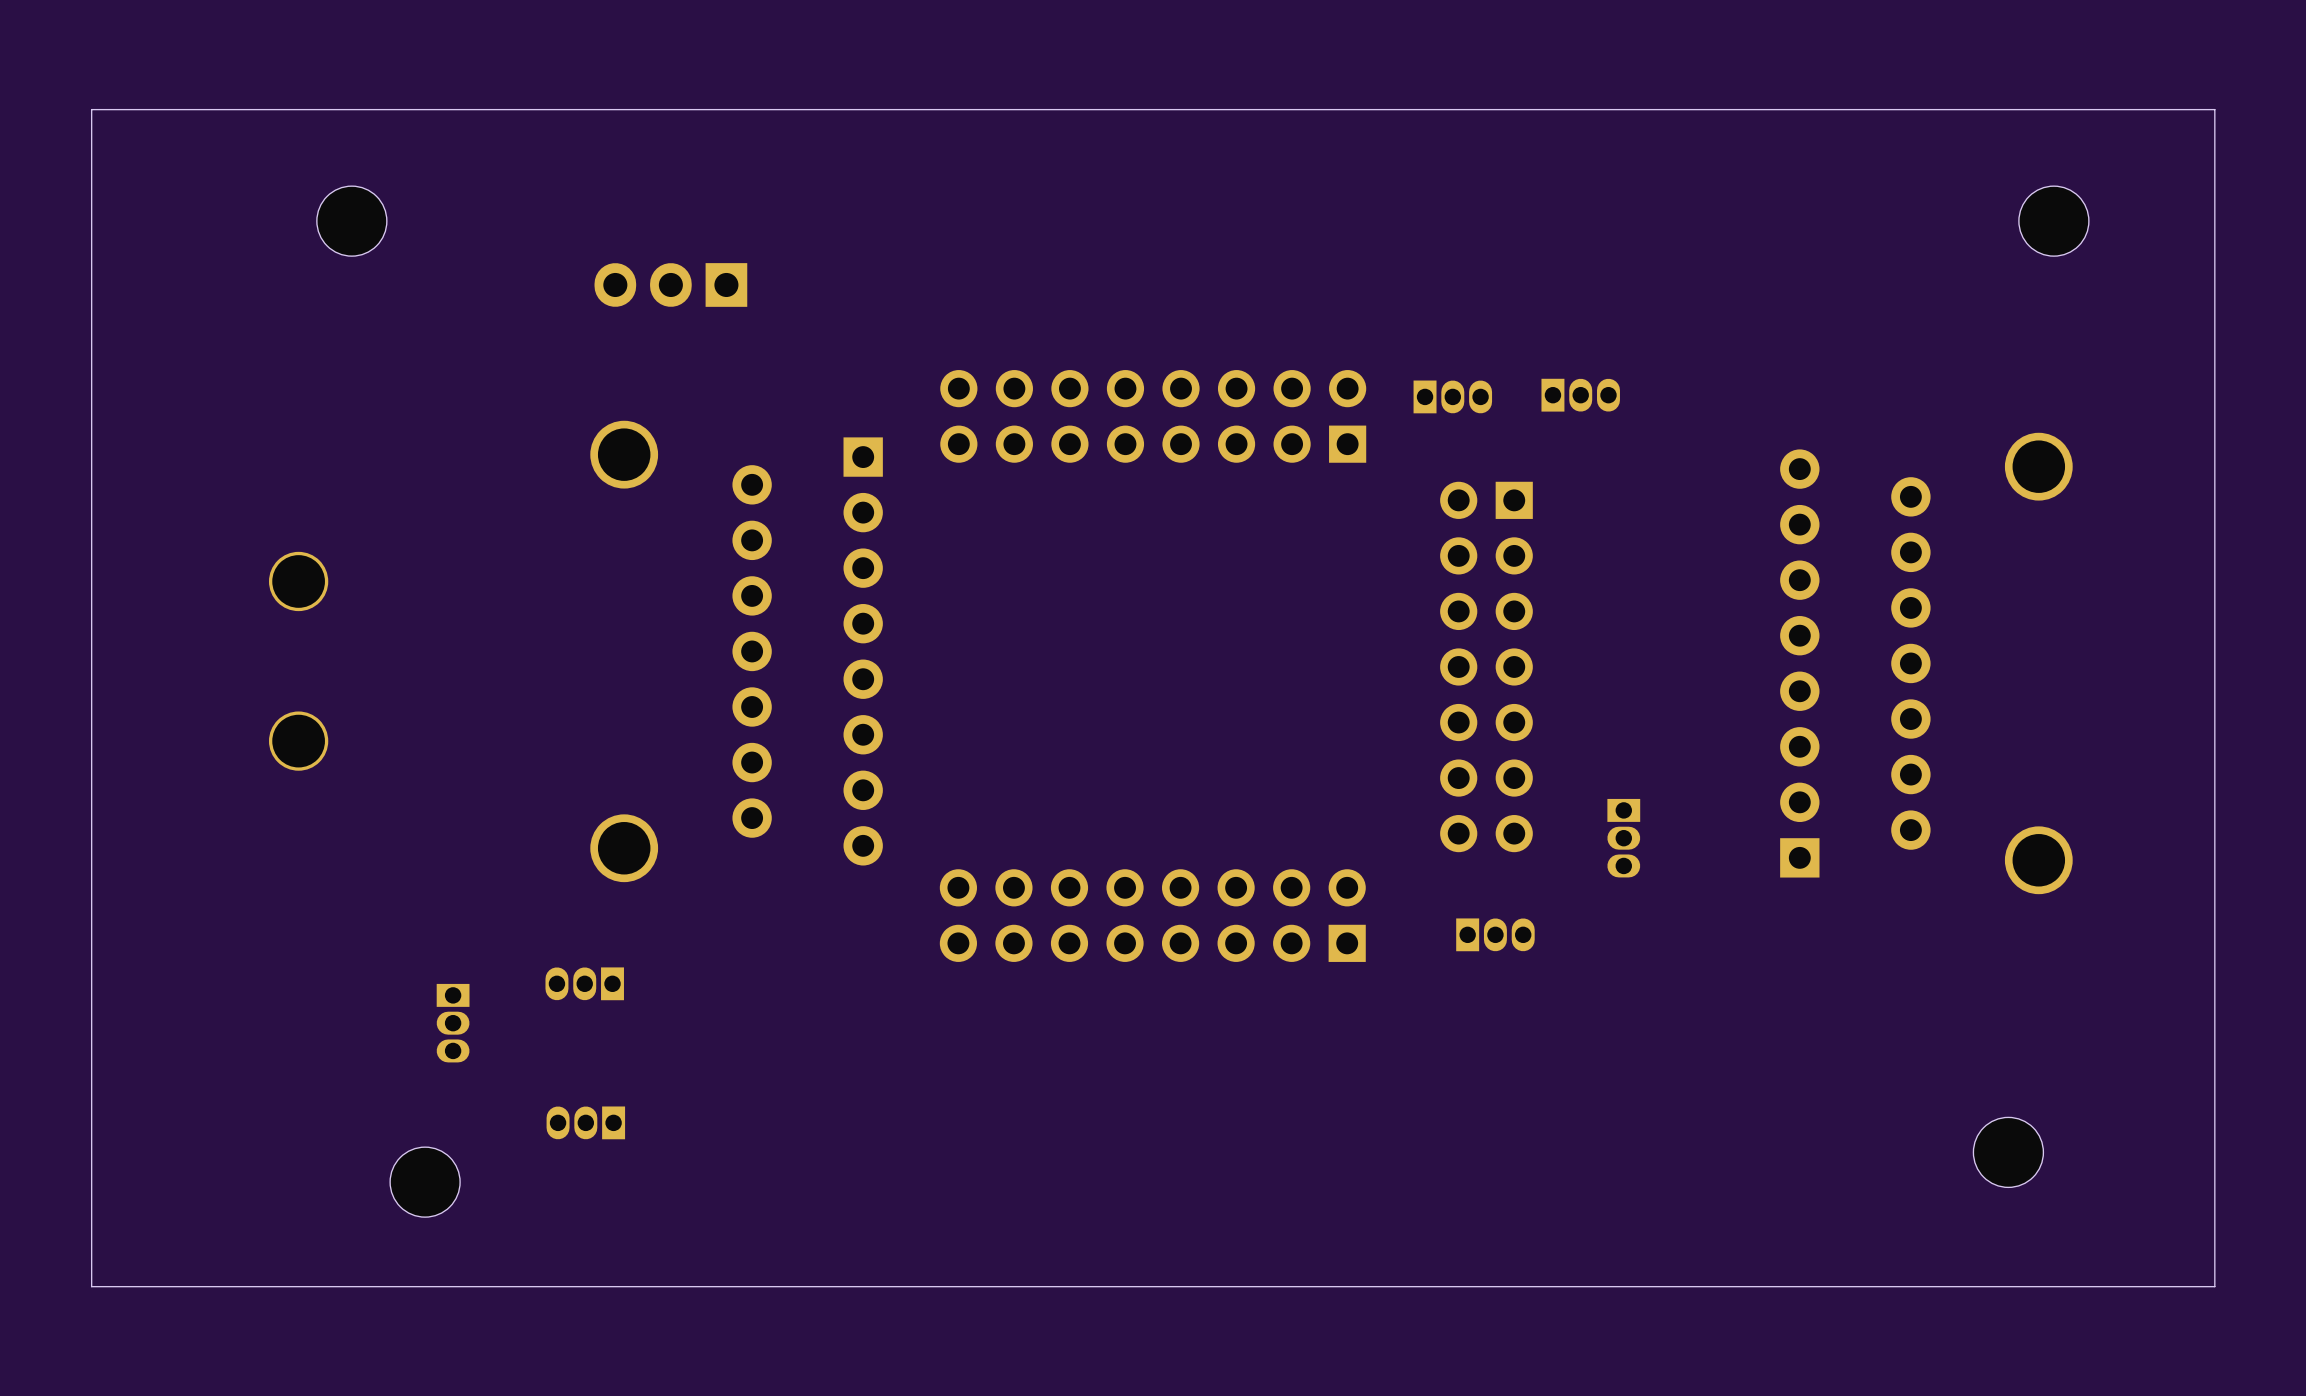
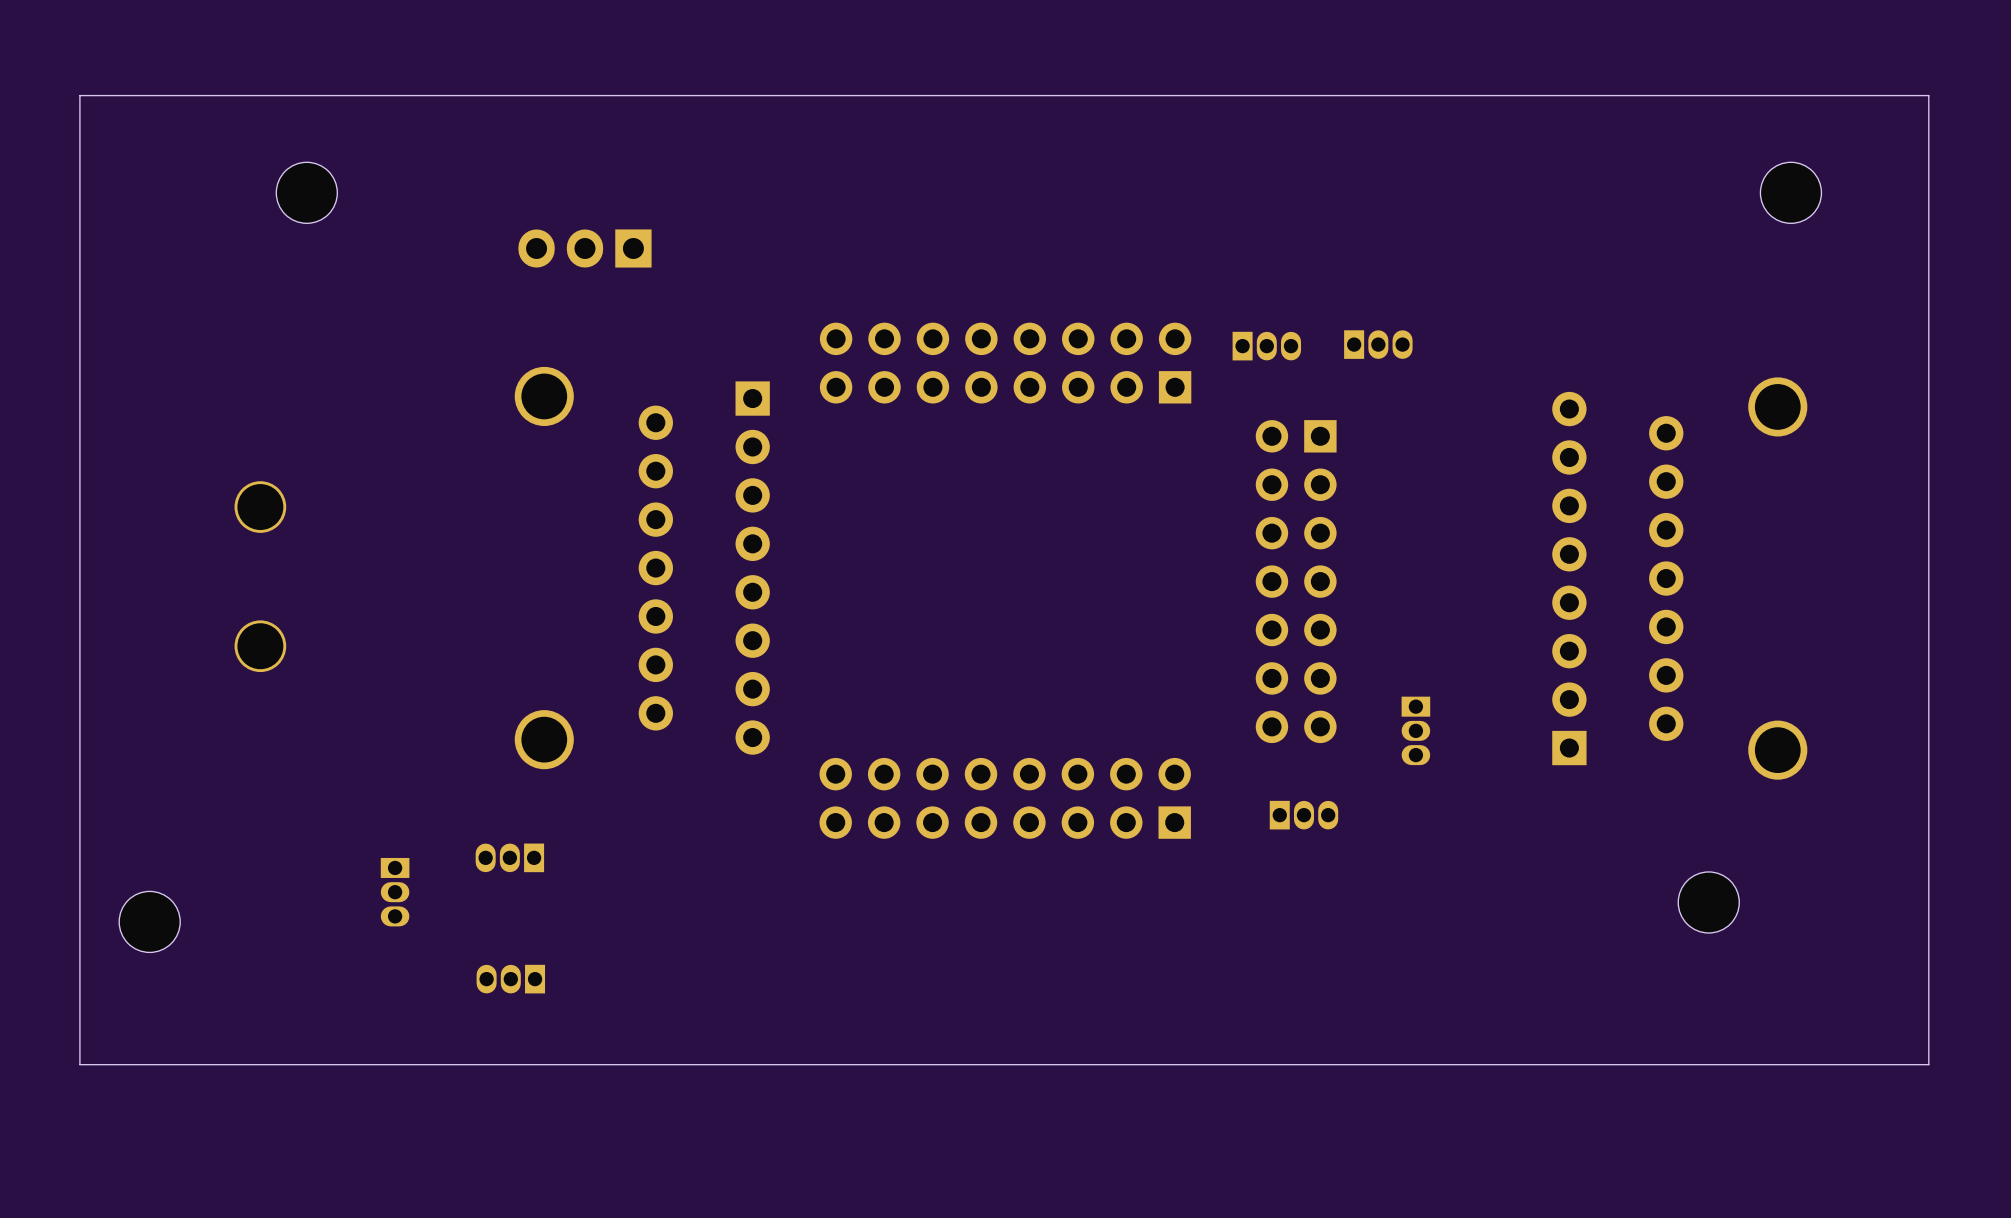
board edge: (2211, 109) (2214, 109) (2214, 1286) (91, 1286) (91, 1220) -> (1928, 95) (1928, 1064) (79, 1064)
part position: (2008, 1152) -> (1708, 902)
part position: (425, 1182) -> (149, 921)

